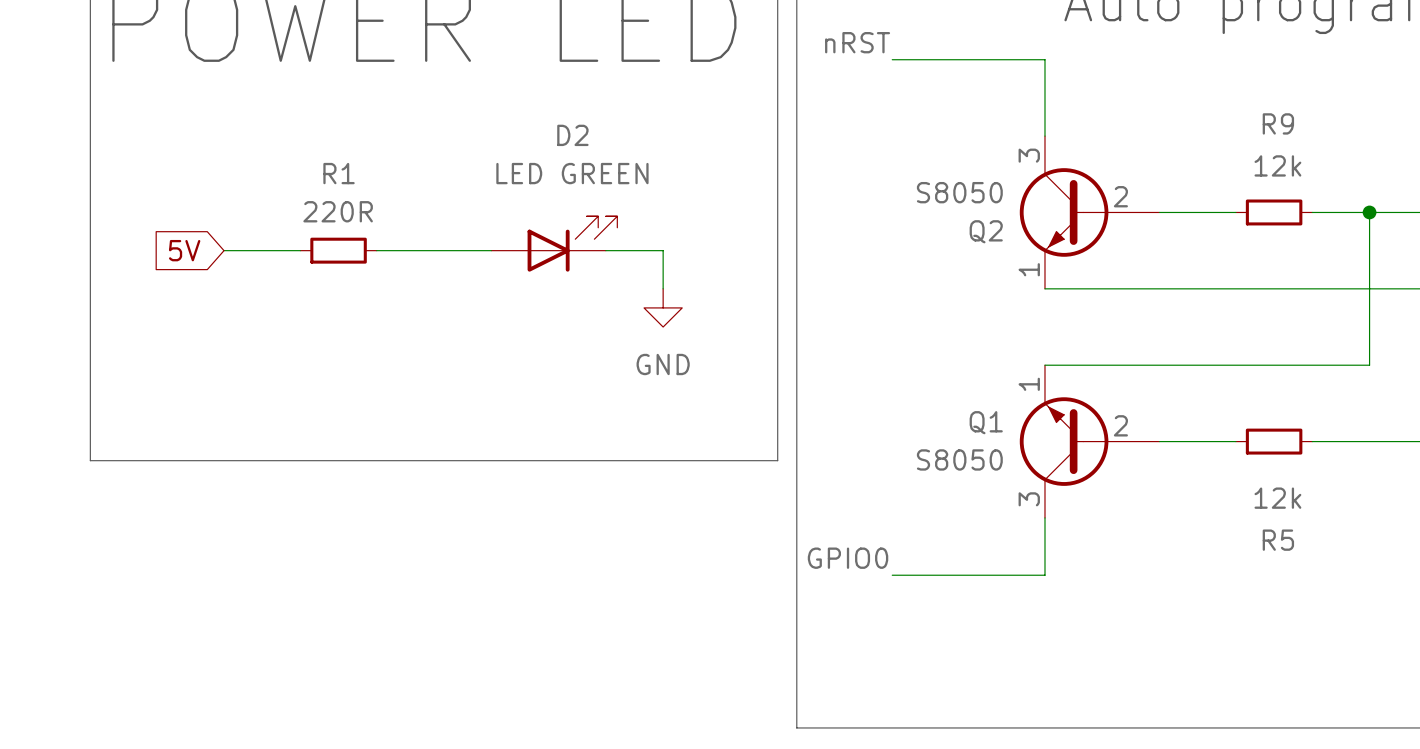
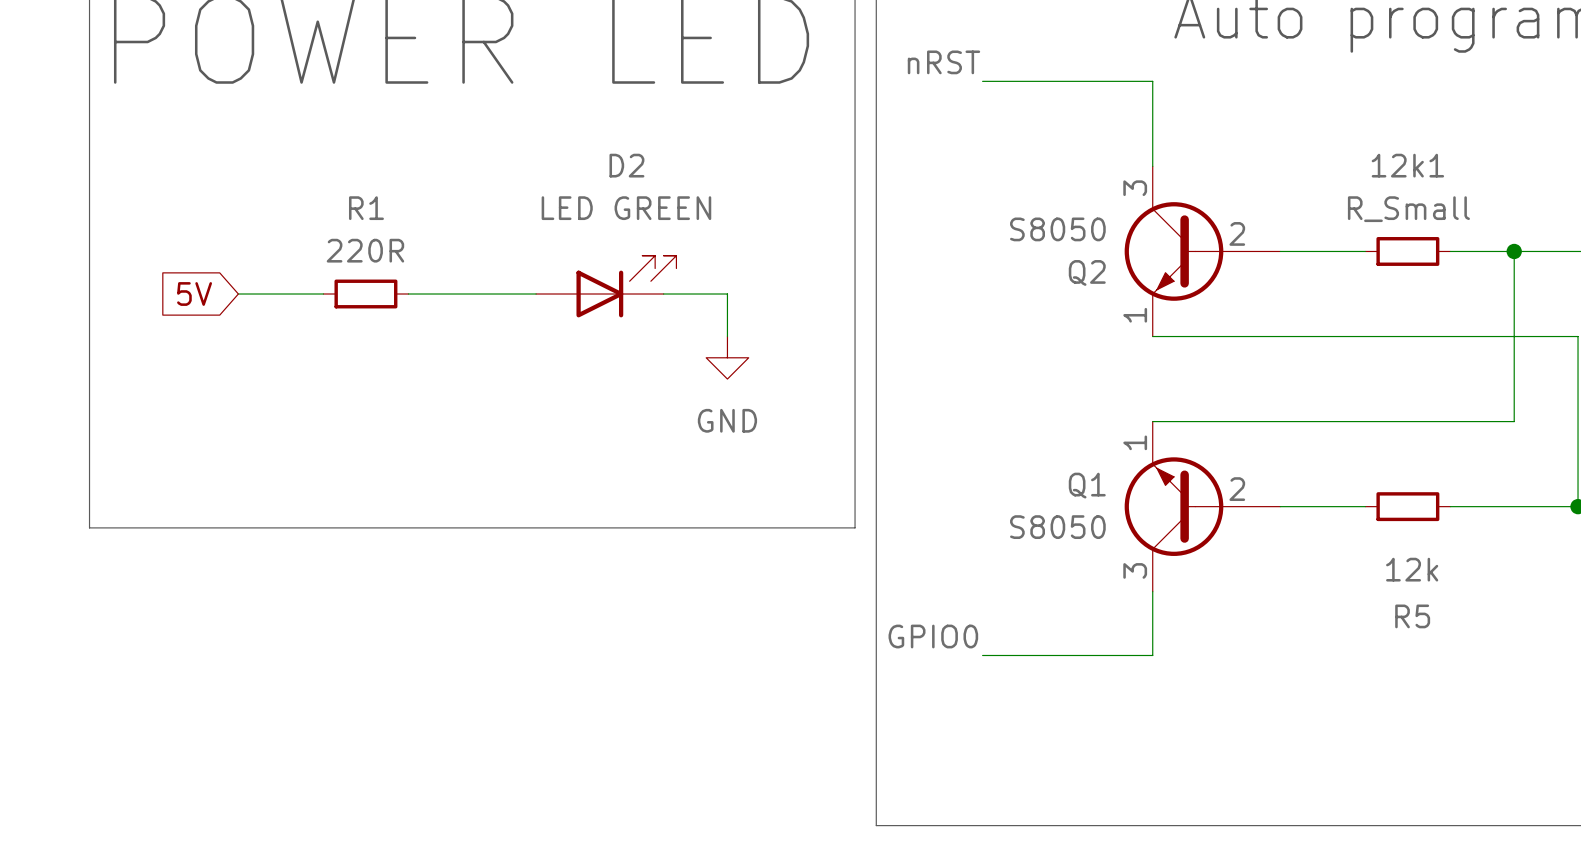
R9 name: R9 (1278, 123) -> 12k1 (1407, 165)
R9 value: 12k (1277, 165) -> R_Small (1408, 209)

